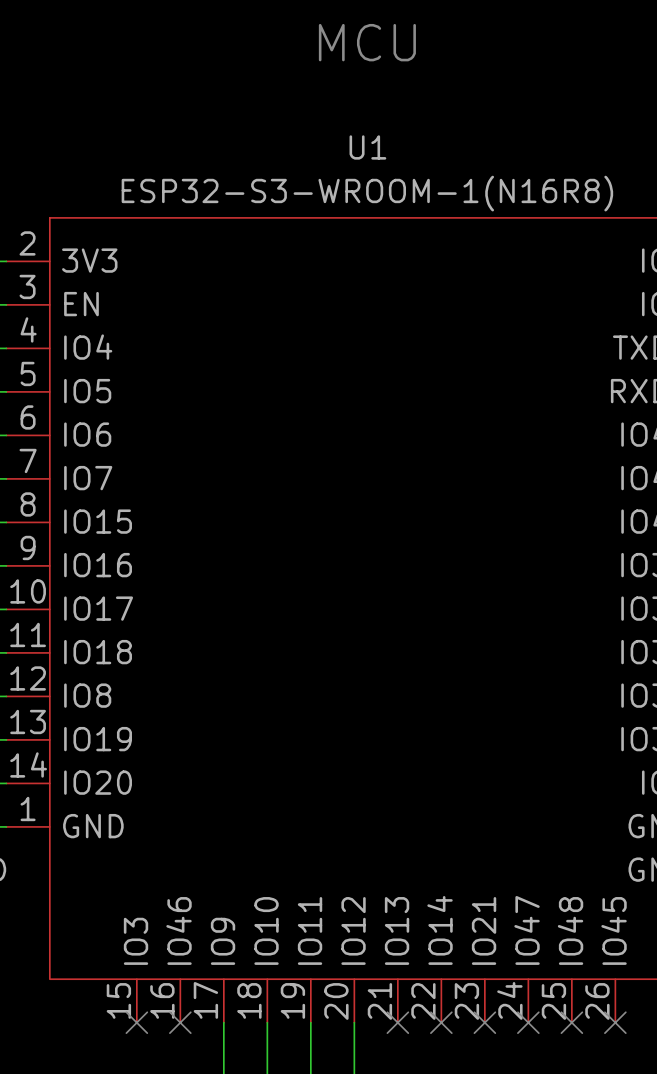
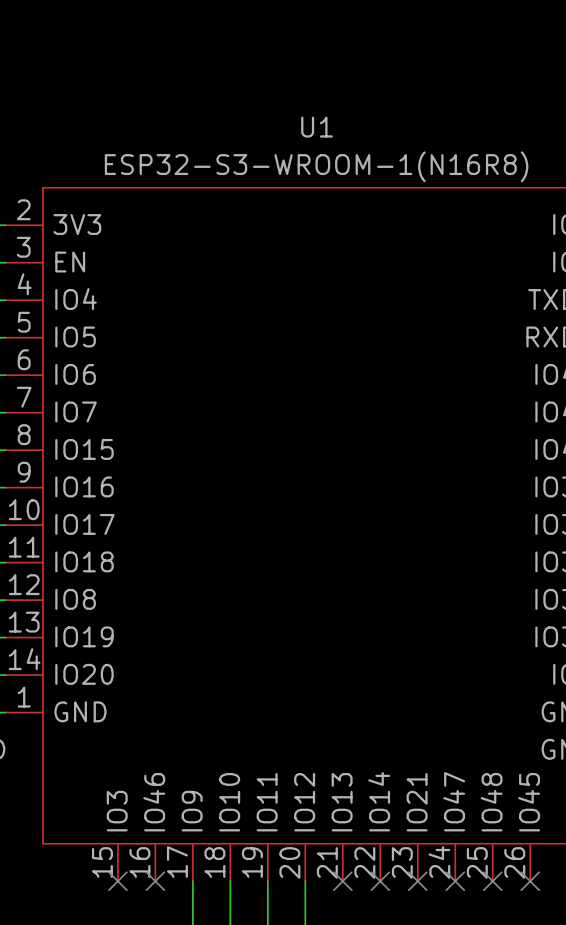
text: MCU (367, 42) -> none

